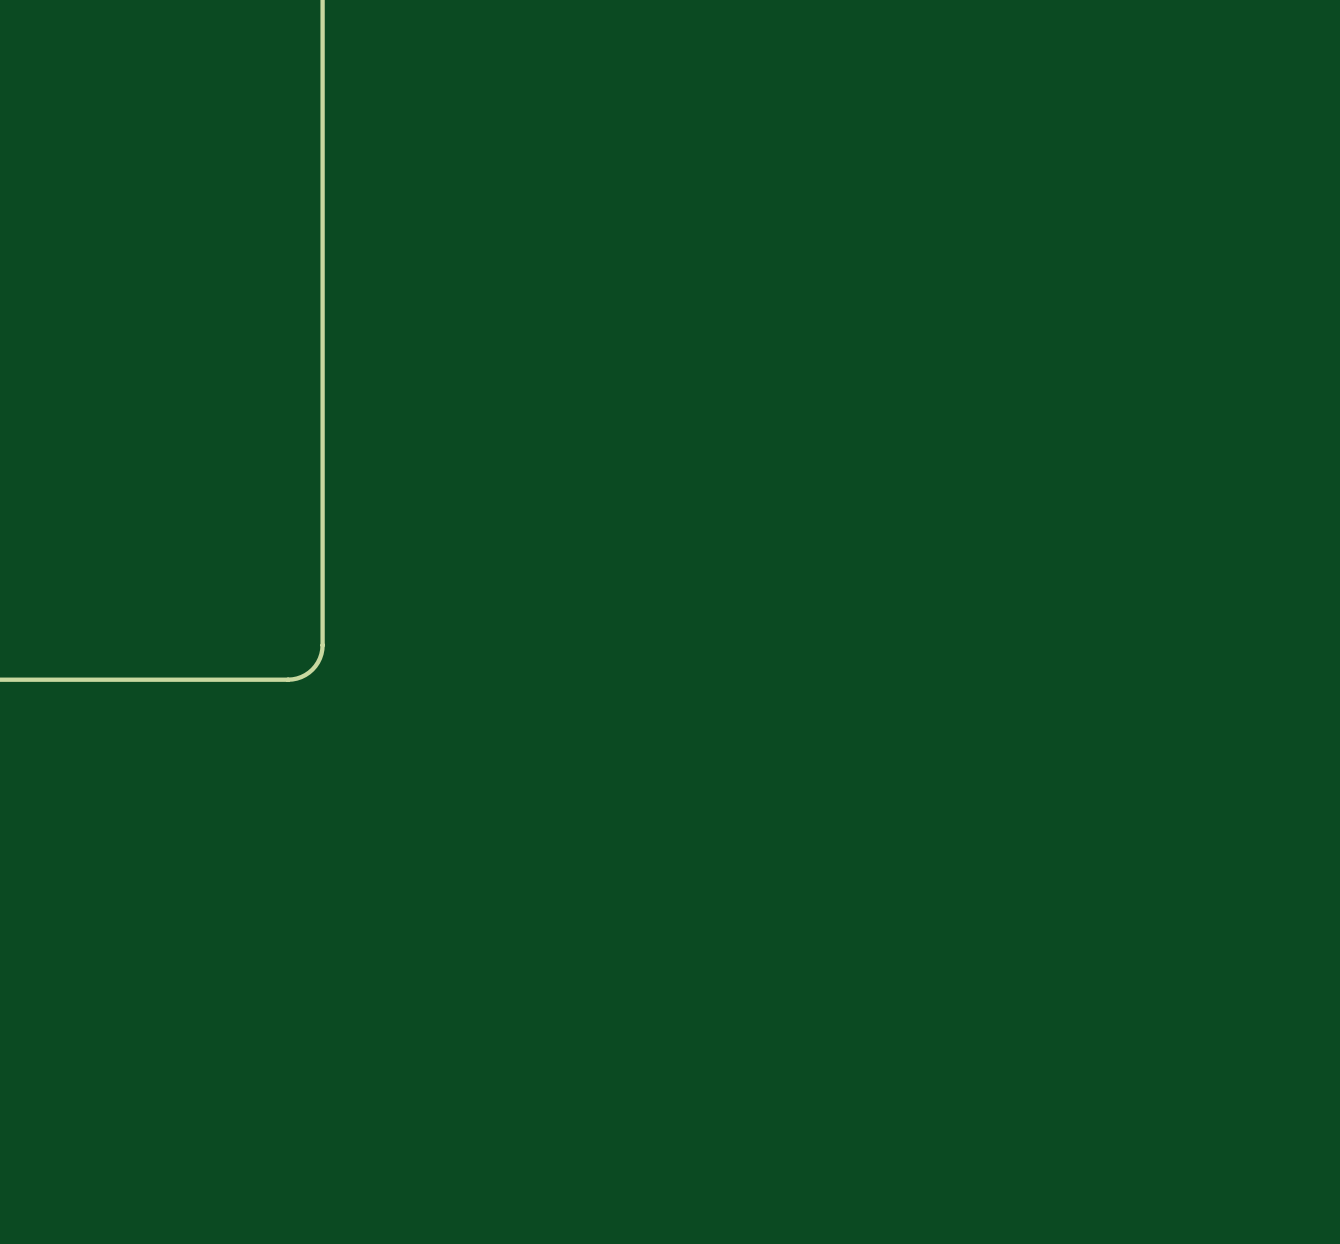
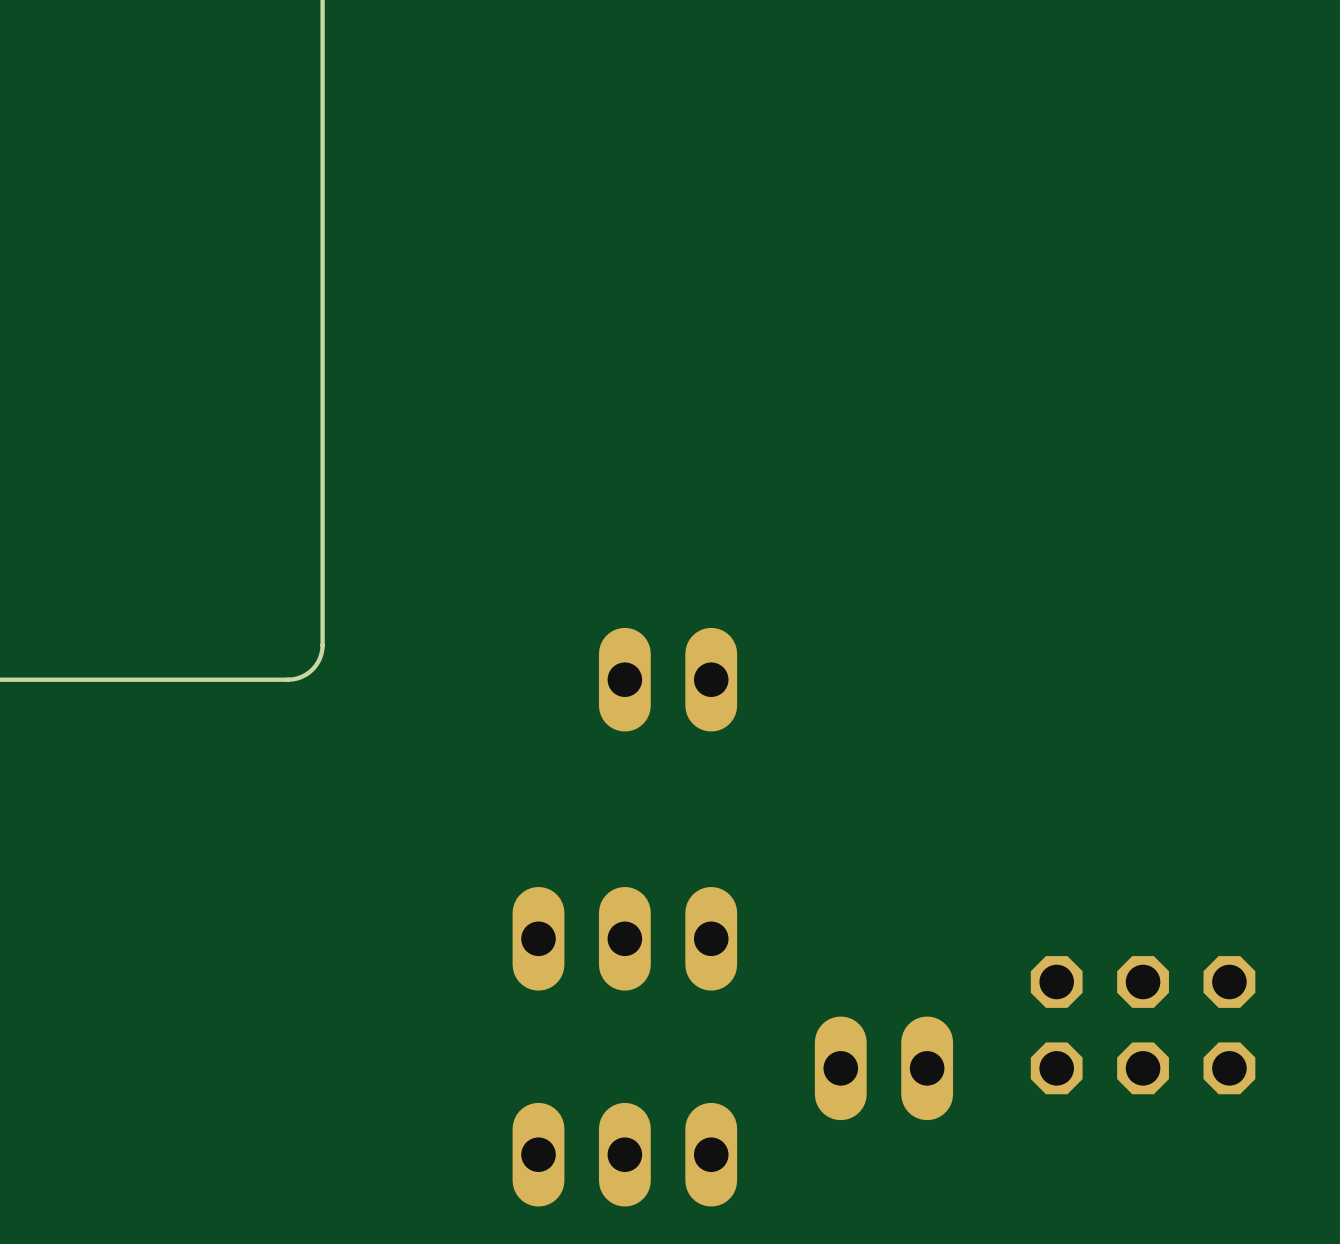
part: none -> (668, 679)
part: none -> (624, 938)
part: none -> (1143, 1025)
part: none -> (883, 1068)
part: none -> (624, 1154)

